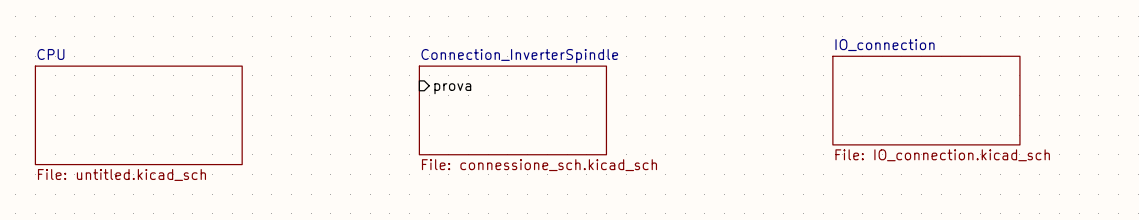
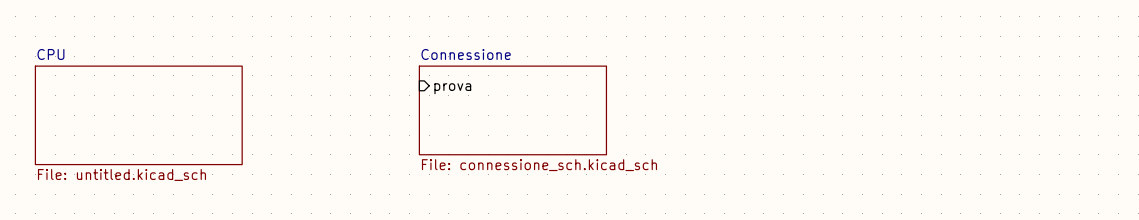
sheet Connection_InverterSpindle name: Connection_InverterSpindle (519, 56) -> Connessione (466, 54)
sheet IO_connection: File: IO_connection.kicad_sch (926, 100) -> none

